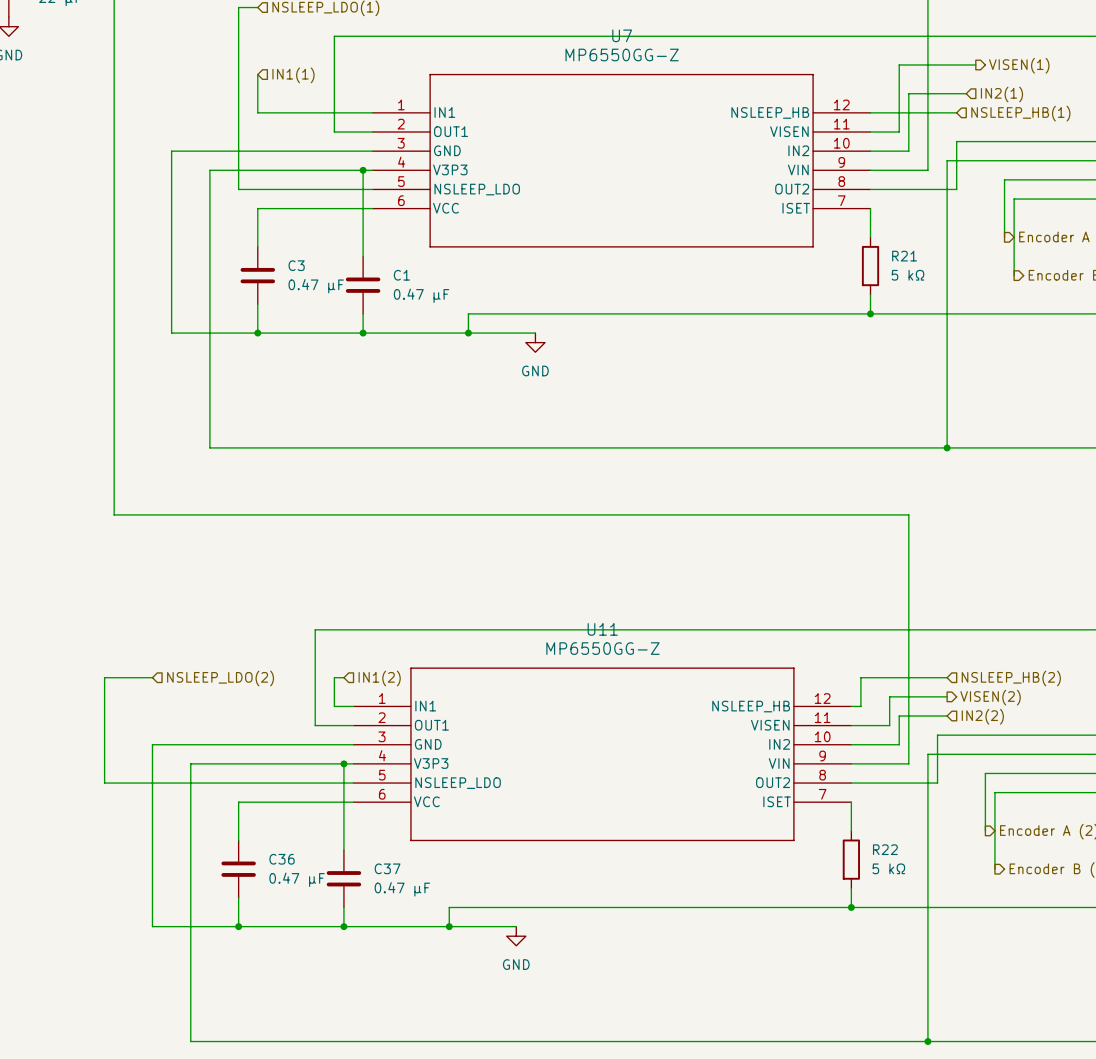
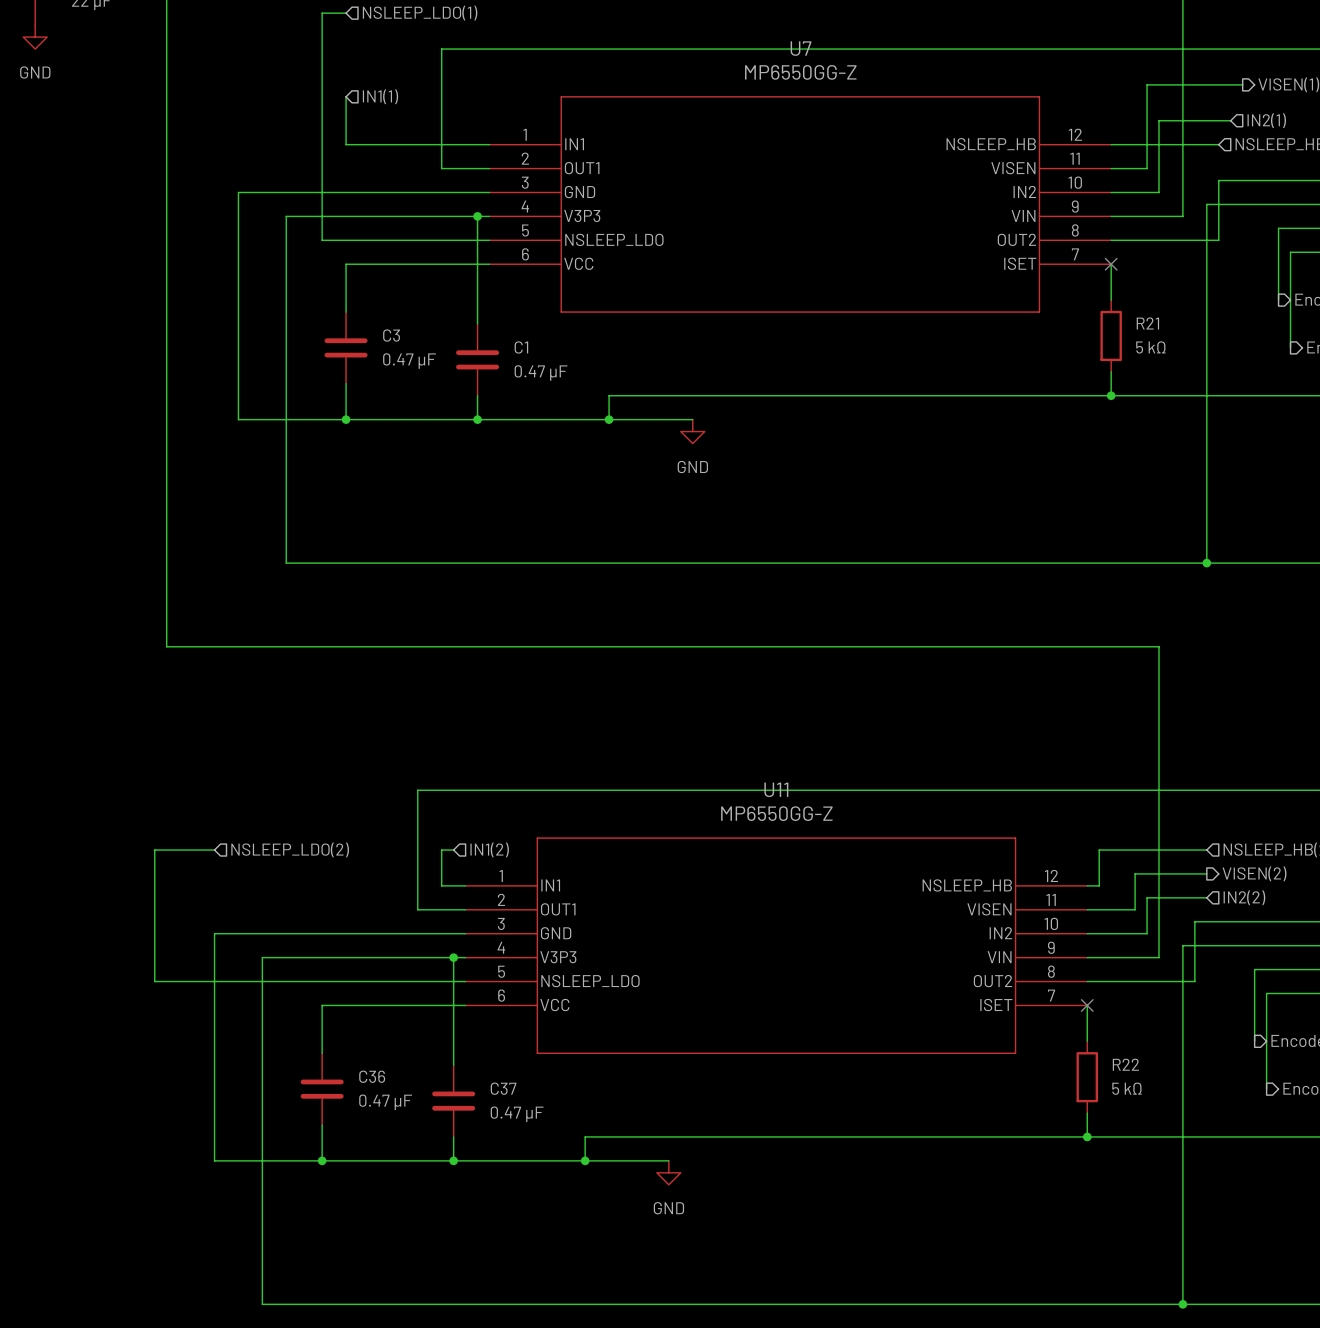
no-connect mark: none -> (1111, 264)
no-connect mark: none -> (1087, 1005)

